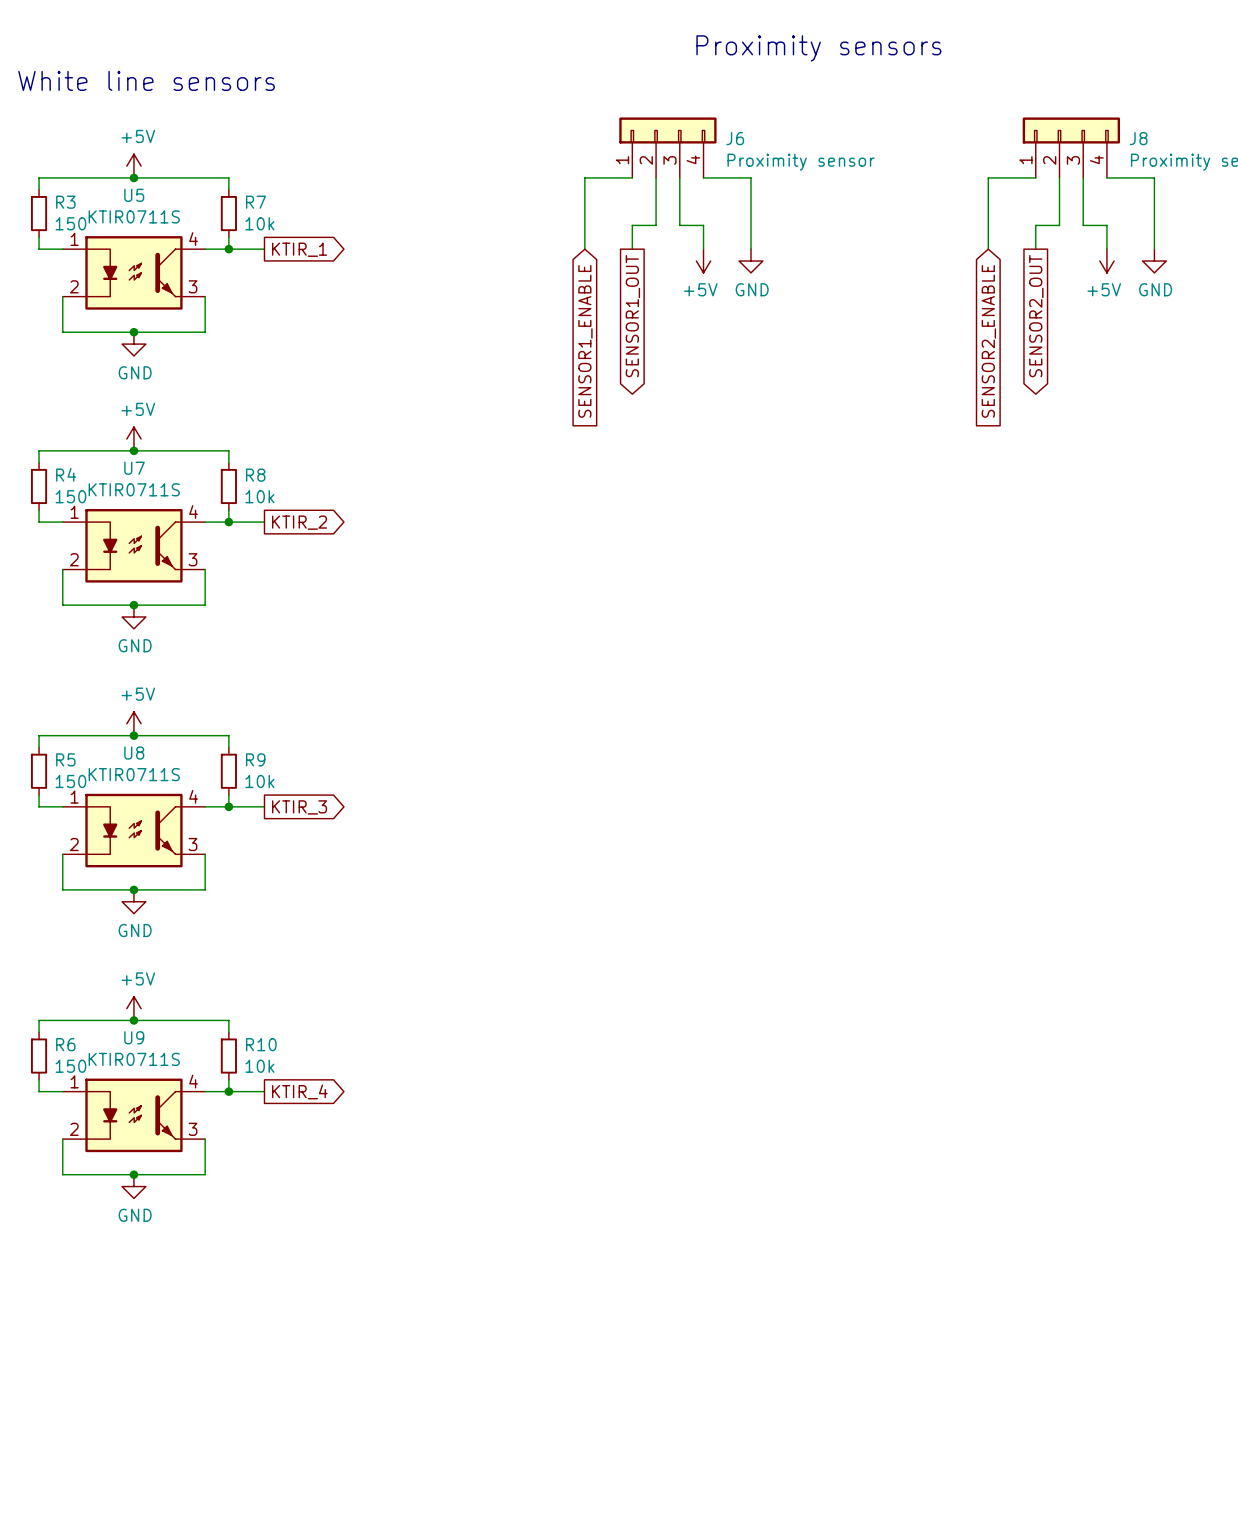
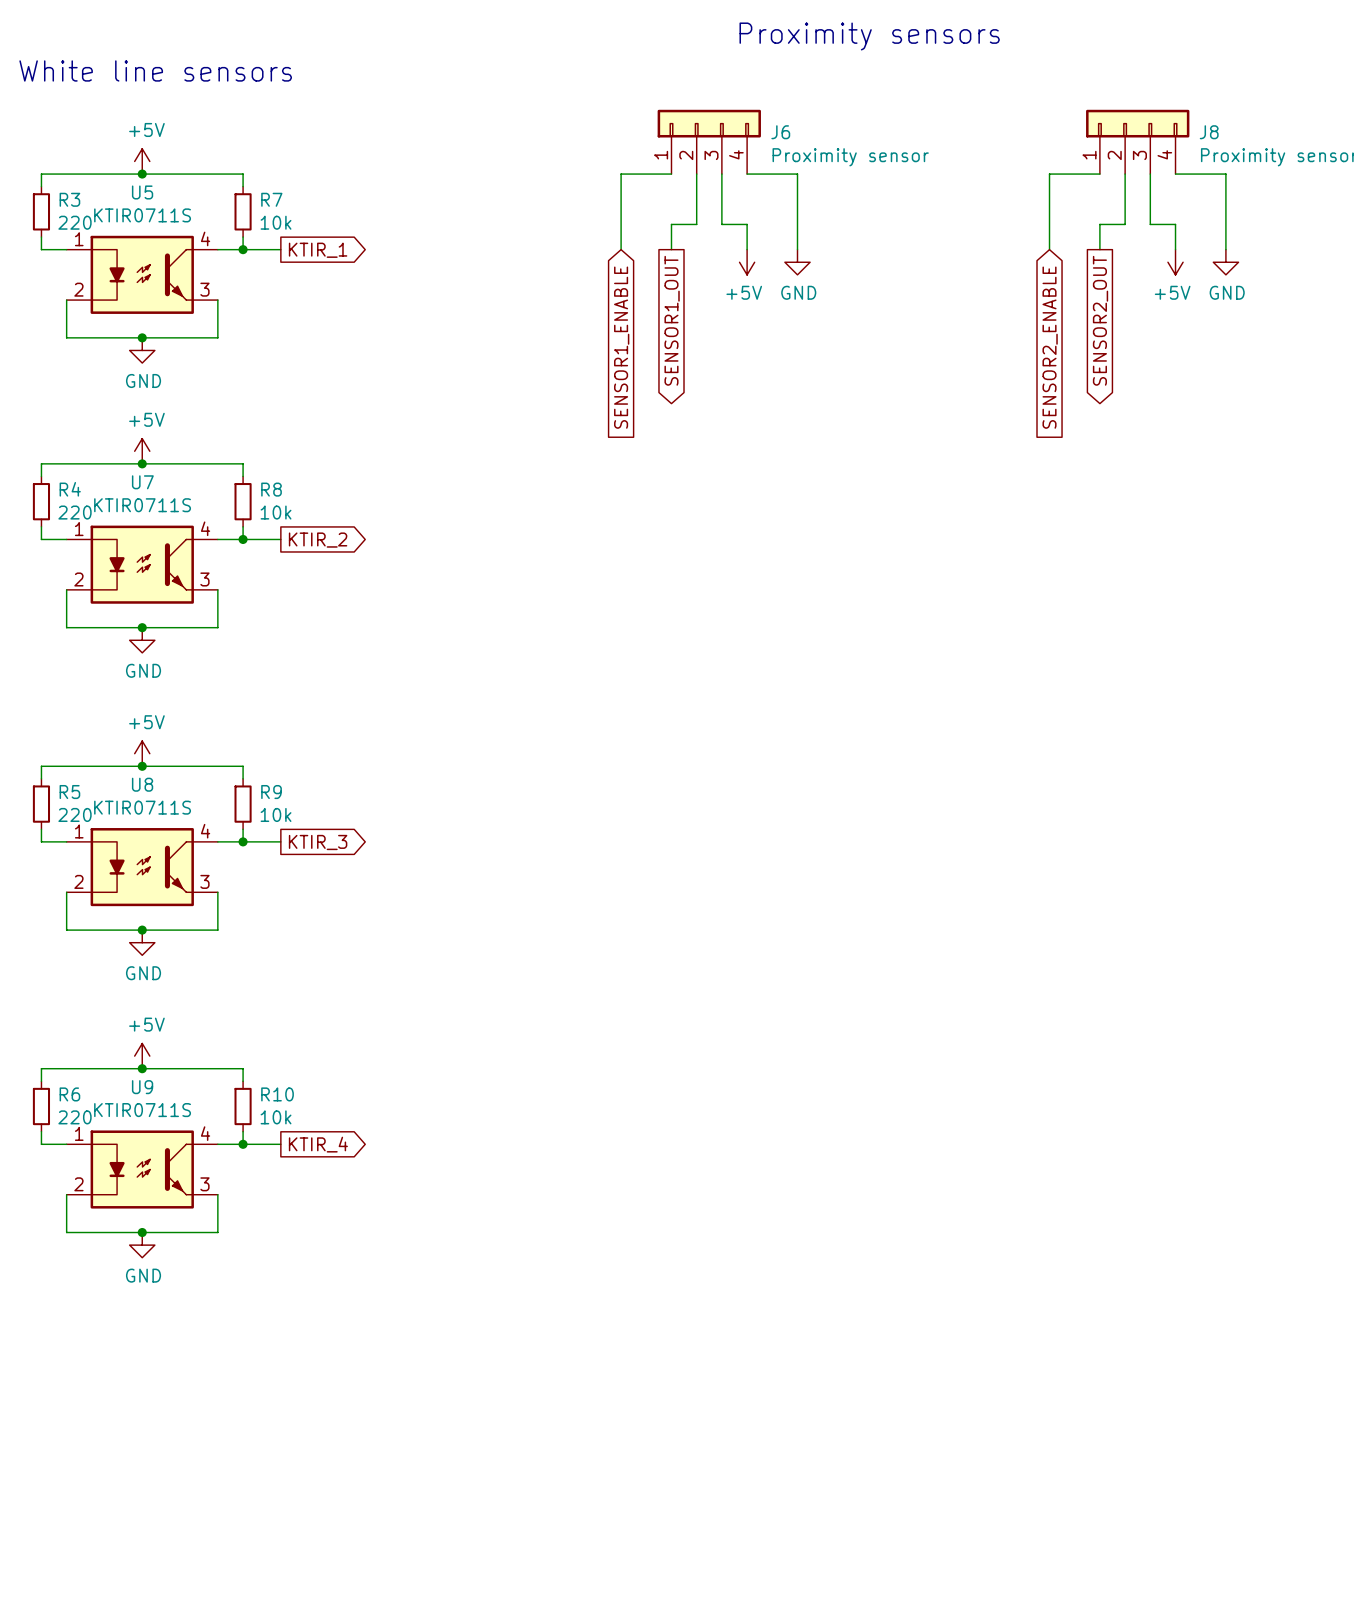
R3 value: 150 (70, 223) -> 220 (75, 222)
R4 value: 150 (70, 496) -> 220 (75, 512)
R5 value: 150 (70, 781) -> 220 (75, 814)
R6 value: 150 (70, 1066) -> 220 (75, 1117)

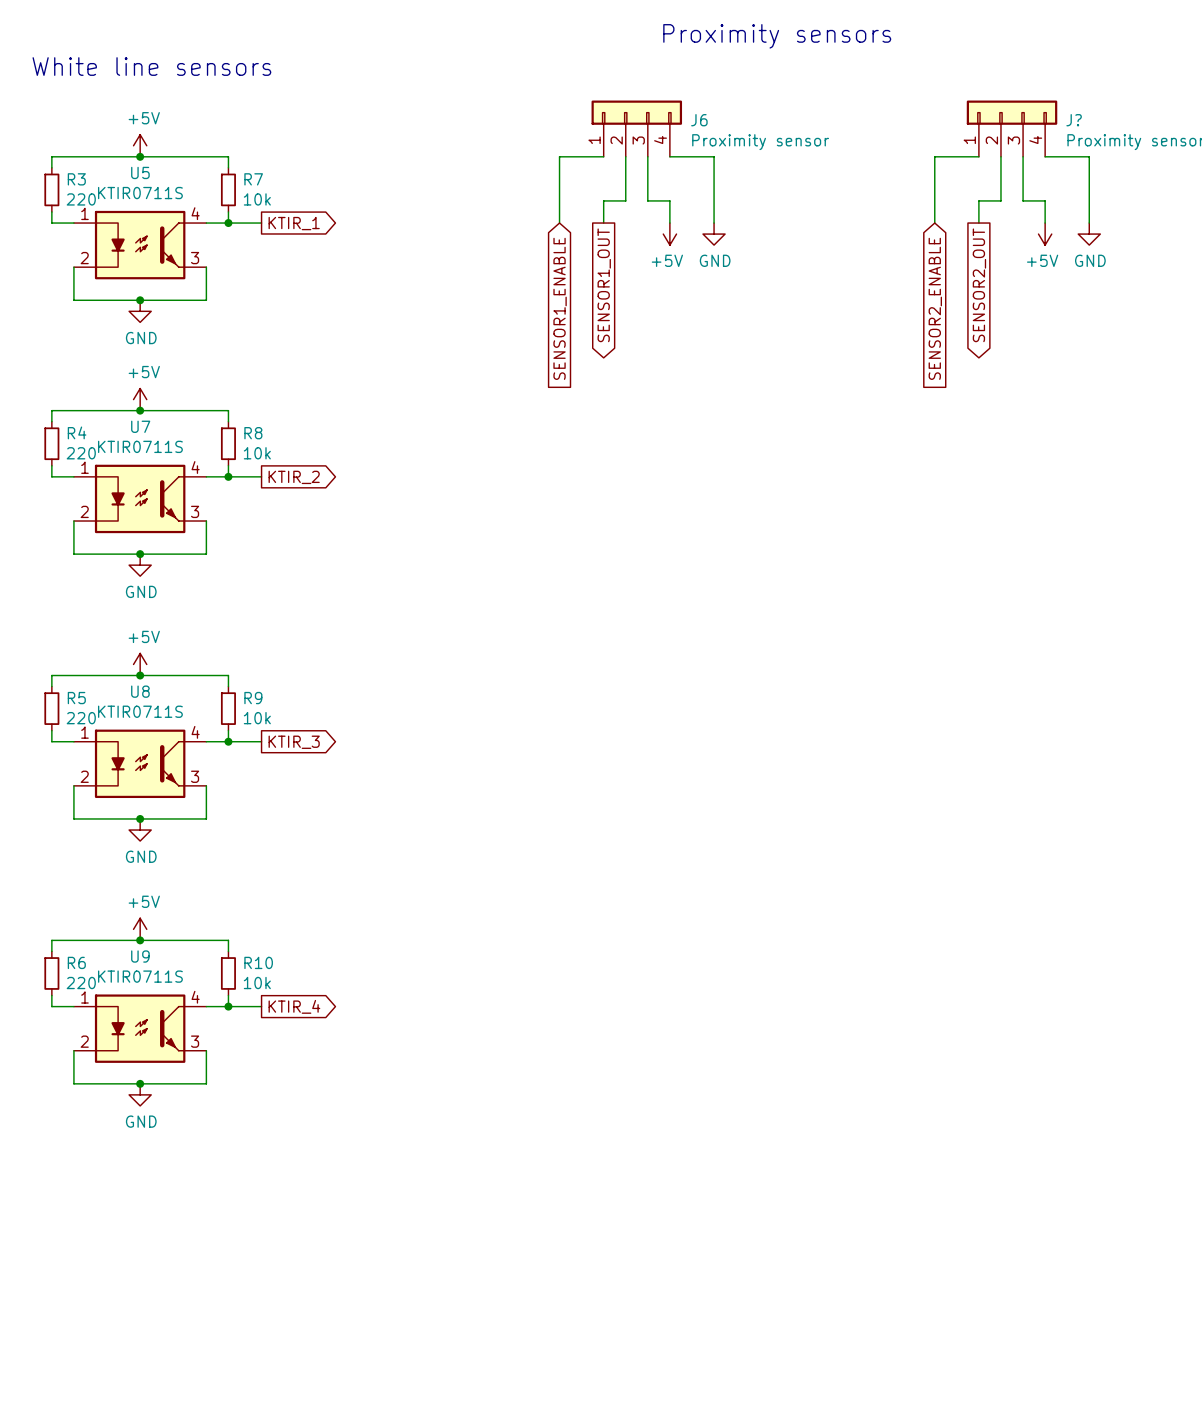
J8 name: J8 (1209, 132) -> J? (1074, 120)

